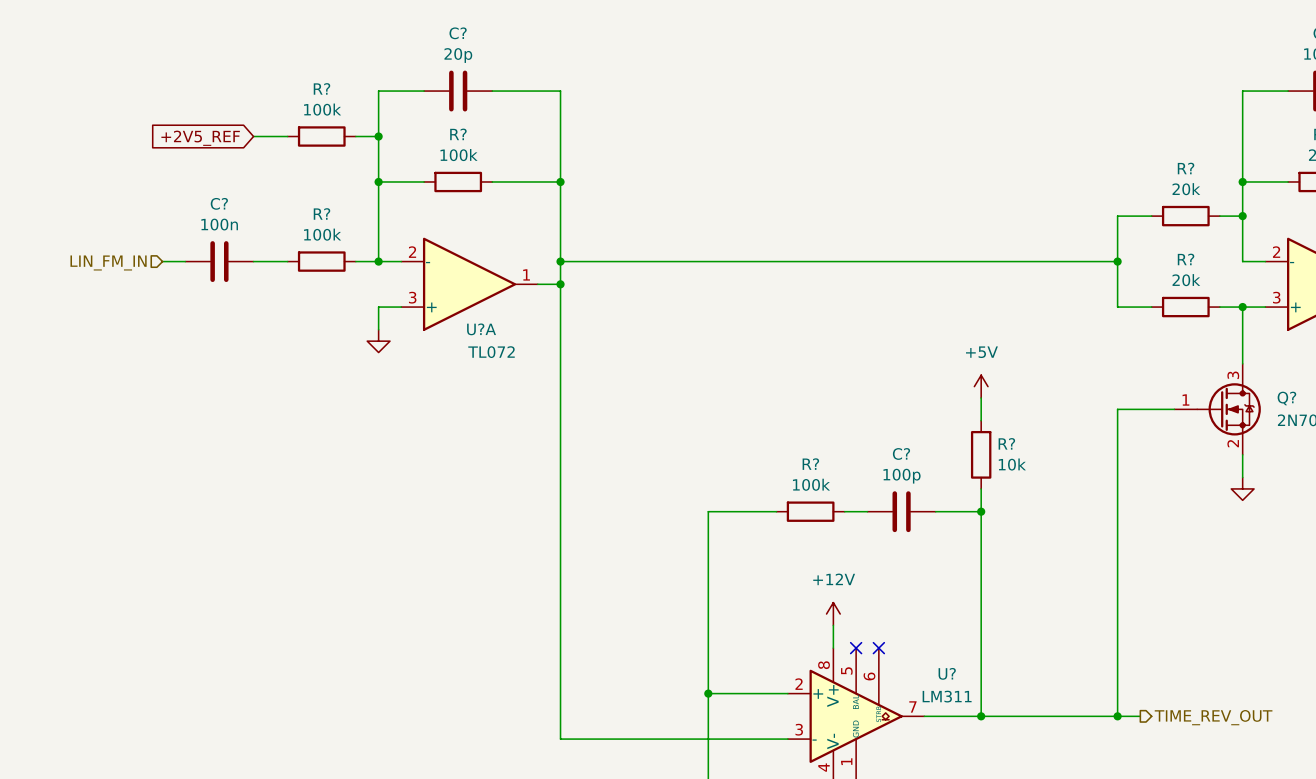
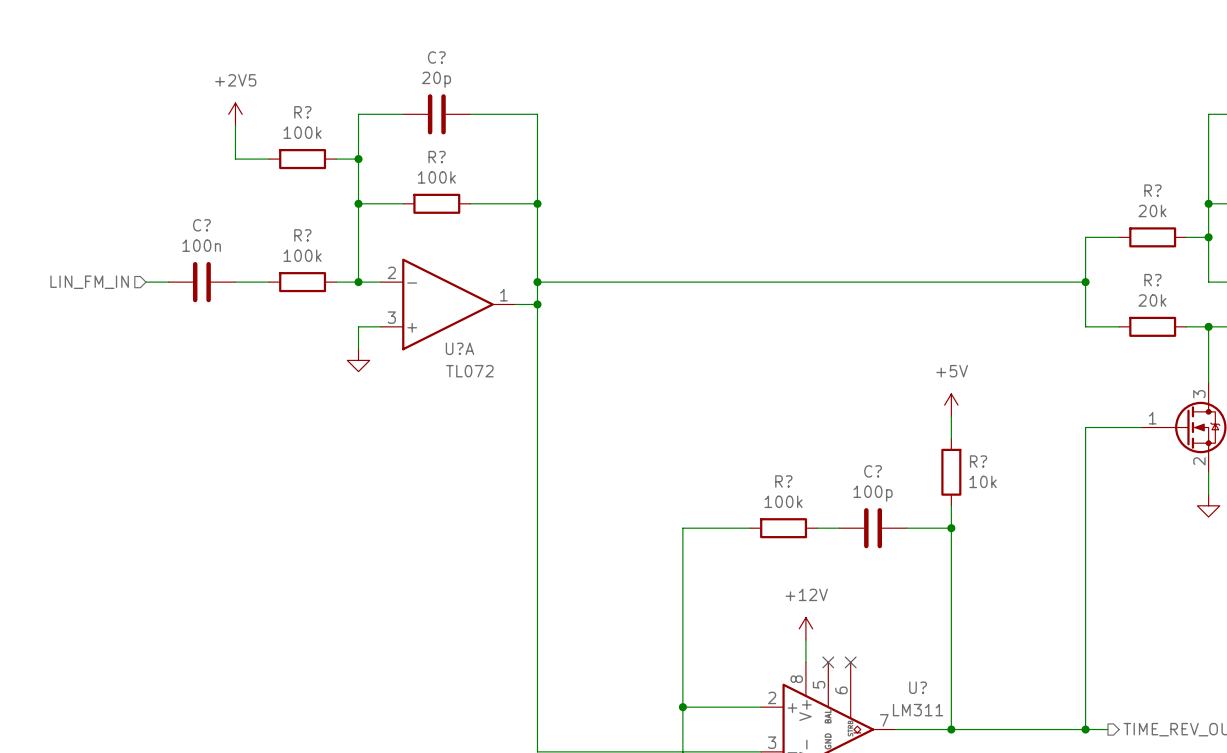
power symbol: none -> +2V5 (235, 114)
wire: none -> (235, 125) (235, 159)
global label: +2V5_REF (200, 138) -> none

